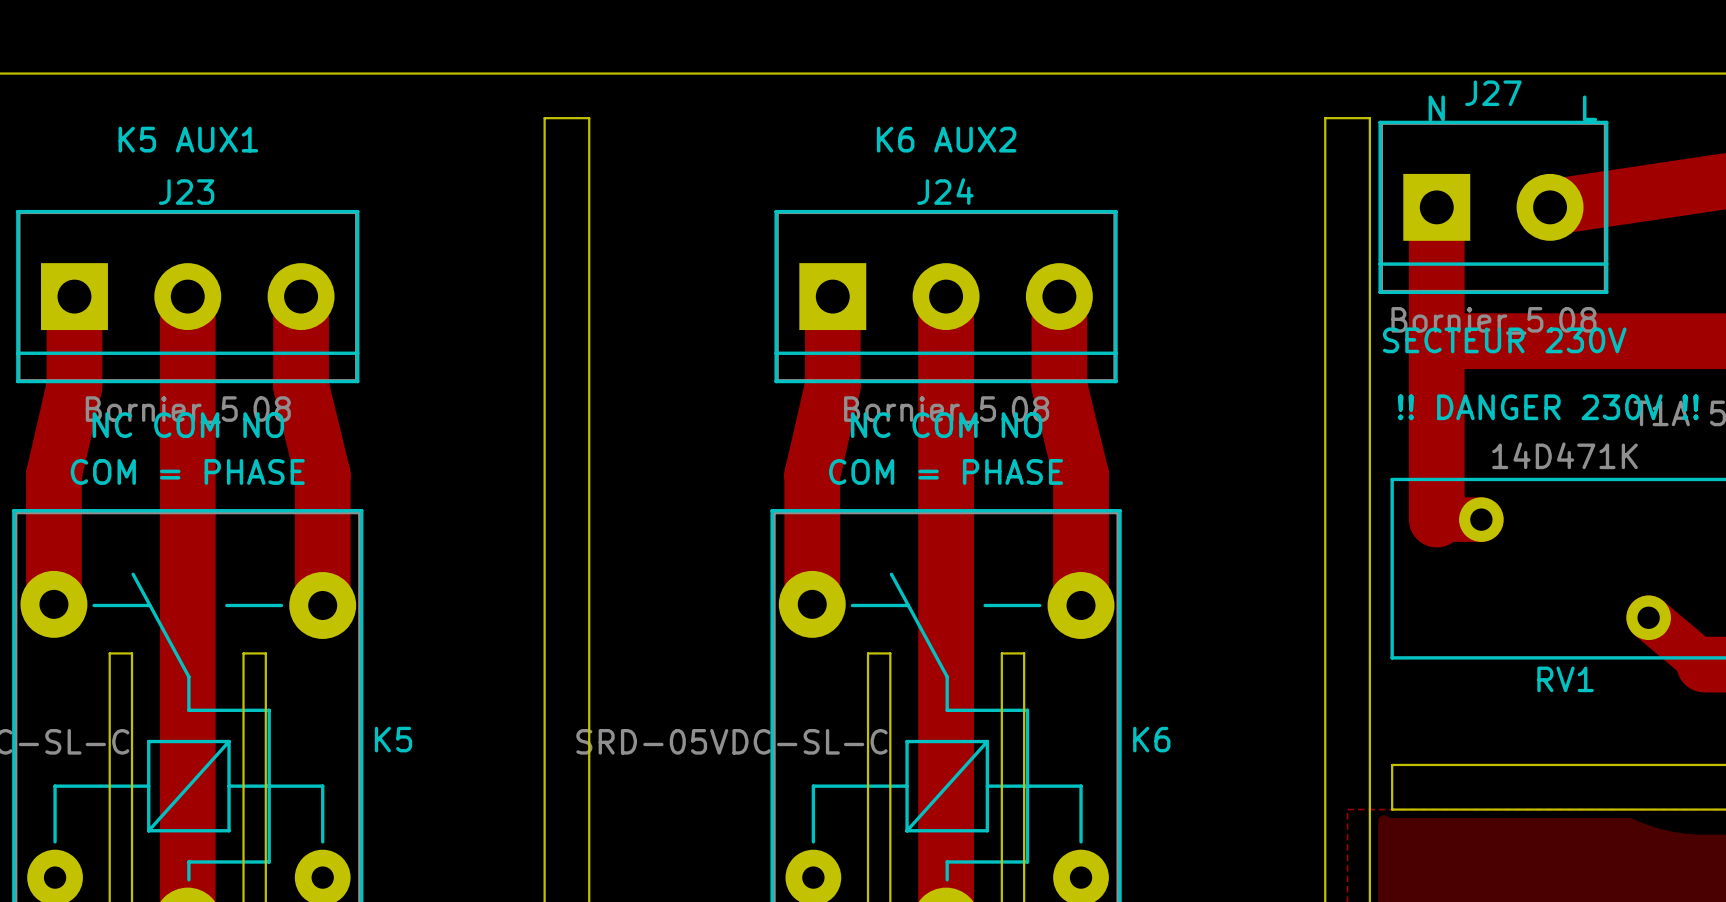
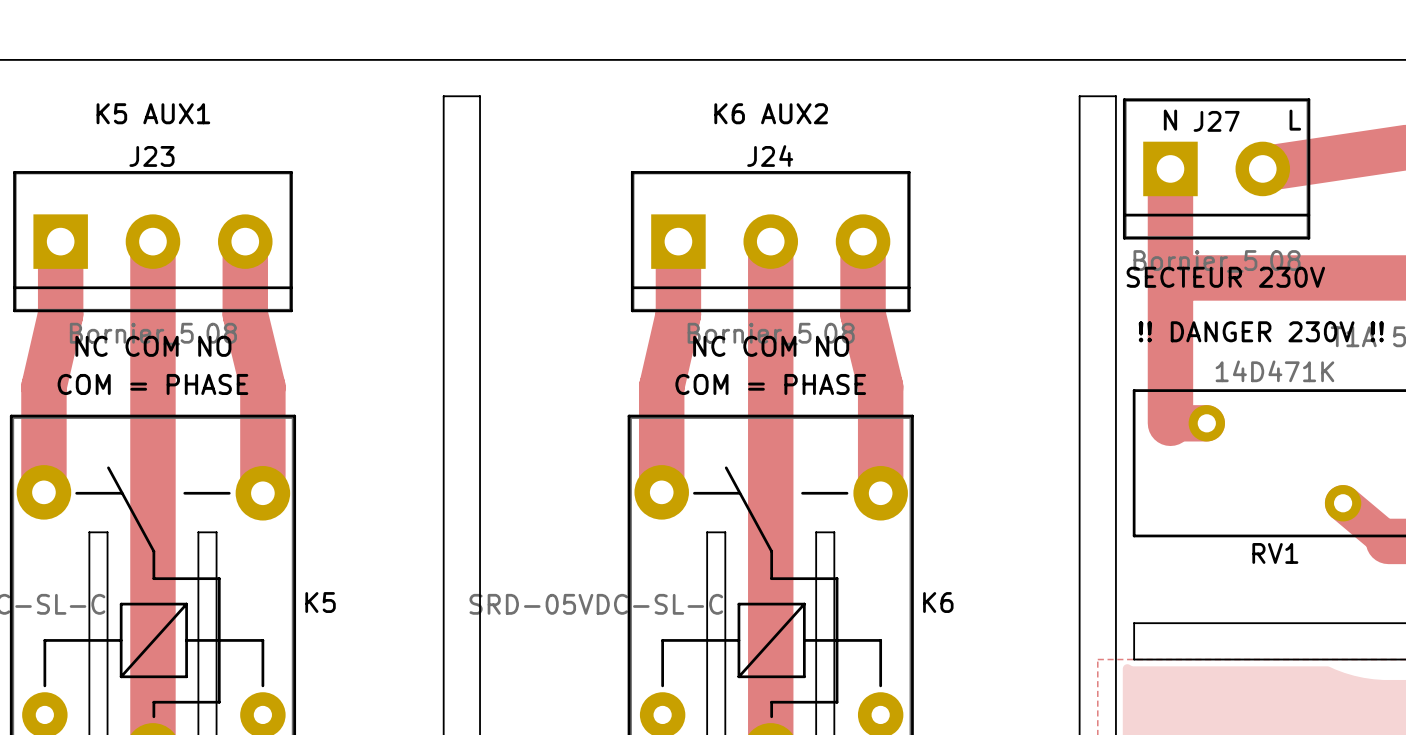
J27 name position: J27 (1493, 93) -> J27 (1216, 121)
text position: N (1436, 108) -> N (1170, 120)
text position: L (1590, 108) -> L (1295, 120)

